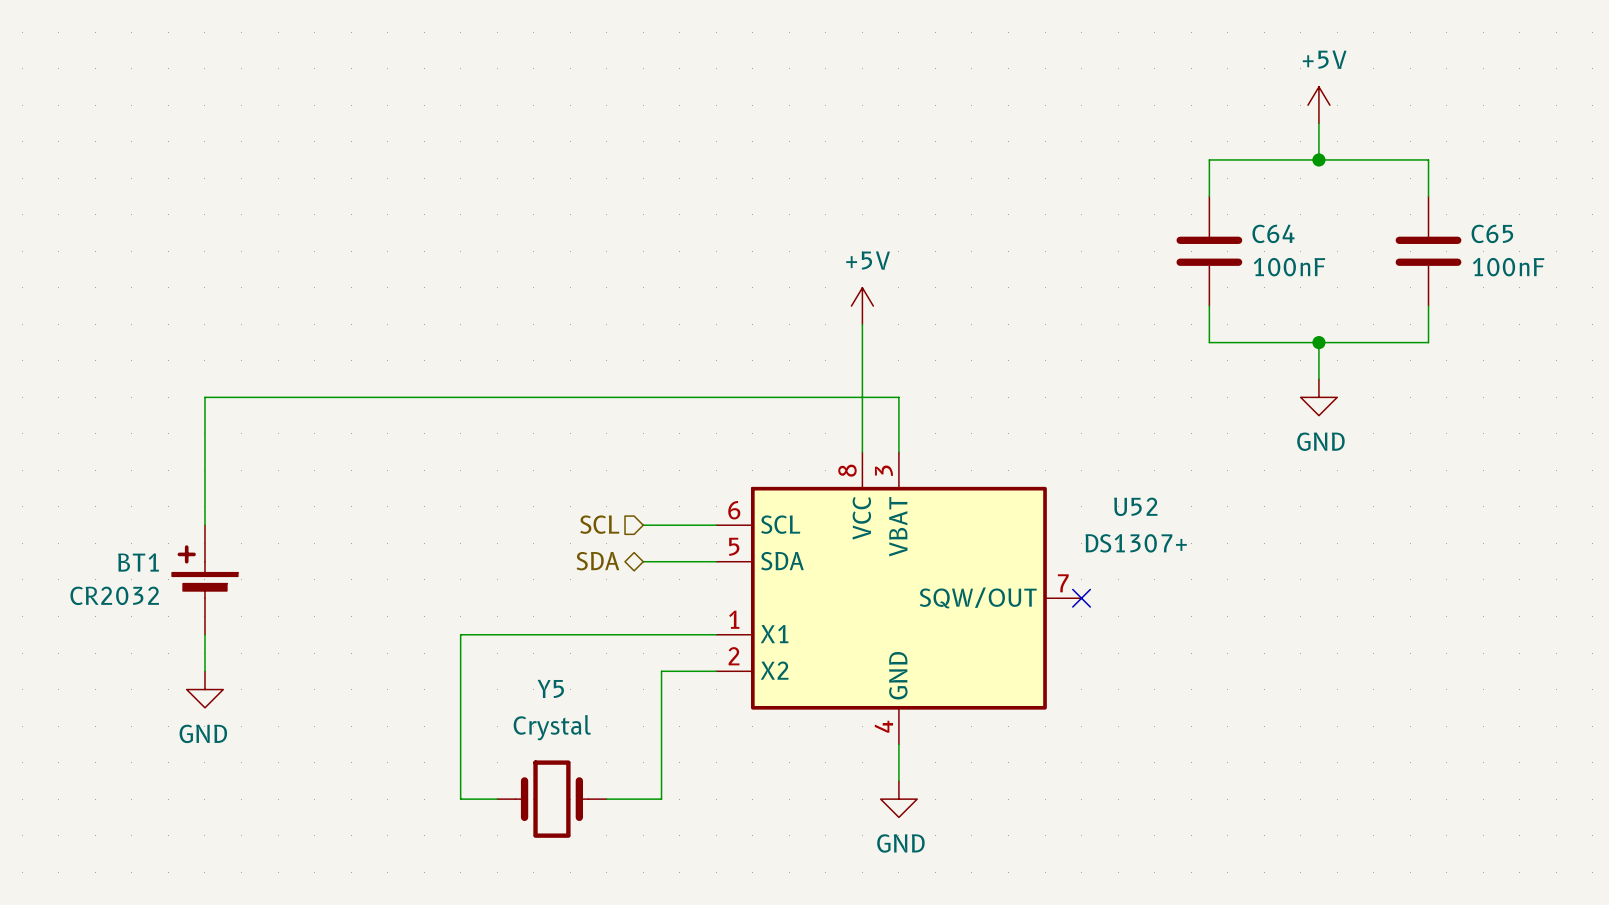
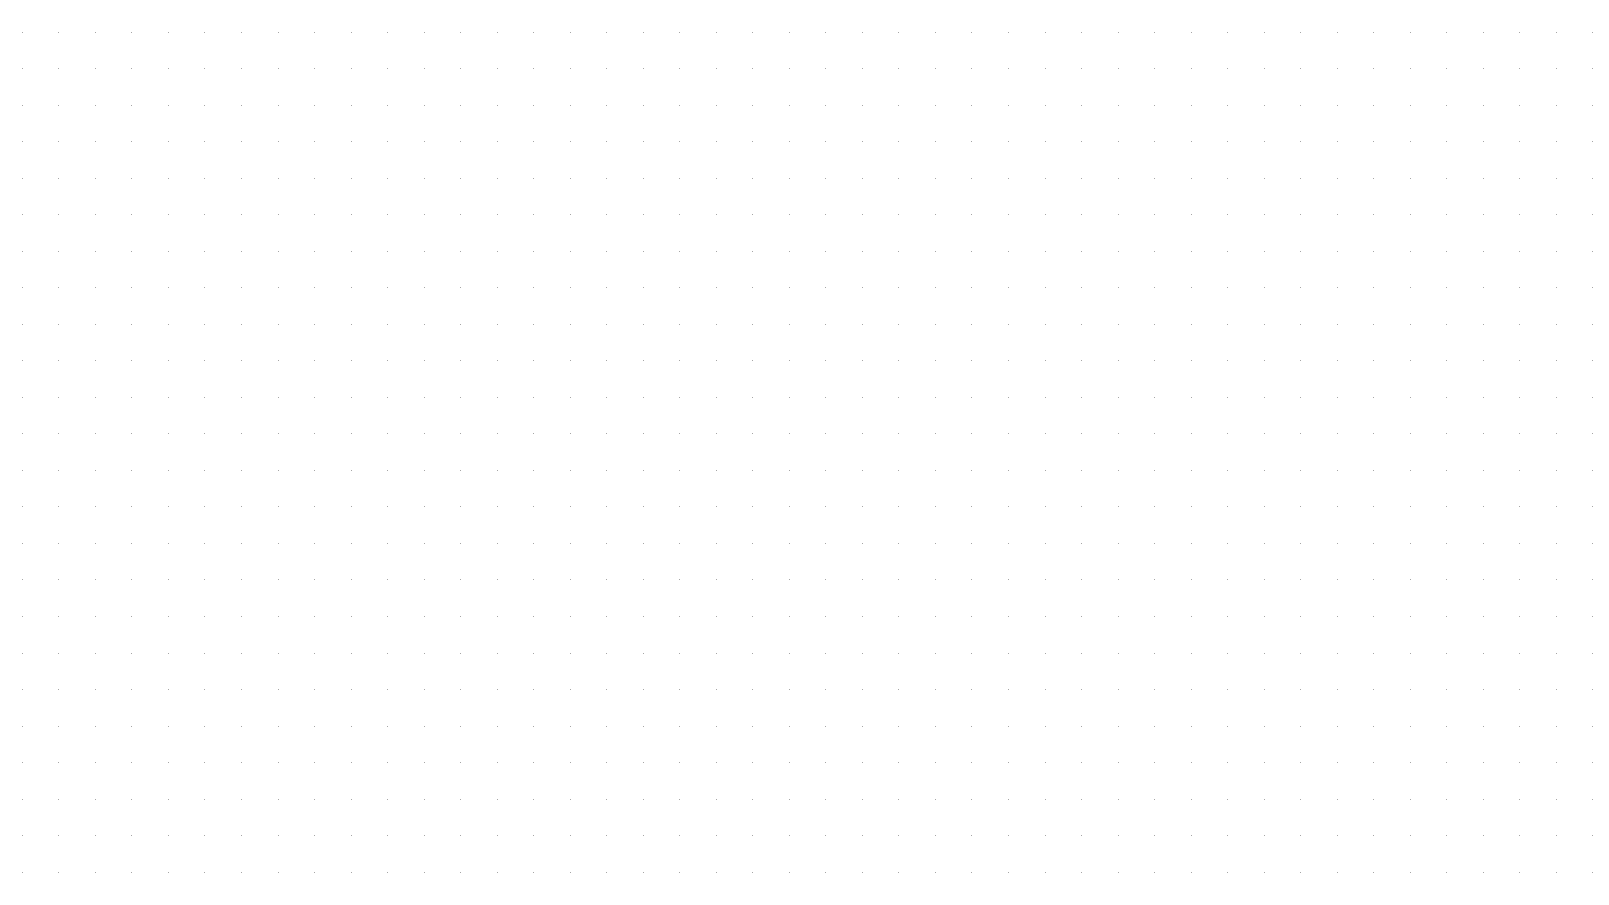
power symbol: +5V (1318, 105) -> none
wire: (1318, 123) (1318, 159) -> none
junction: (1318, 159) -> none
wire: (1209, 196) (1209, 159) (1428, 159) (1428, 196) -> none
C64: 100nF (1209, 251) -> none
C65: 100nF (1428, 251) -> none
power symbol: +5V (862, 306) -> none
wire: (1209, 306) (1209, 342) (1428, 342) (1428, 306) -> none
wire: (862, 324) (862, 452) -> none
wire: (1318, 342) (1318, 379) -> none
junction: (1318, 342) -> none
power symbol: GND (1318, 397) -> none
wire: (898, 452) (898, 397) (204, 397) (204, 525) -> none
hierarchical label: SCL (599, 524) -> none
wire: (643, 525) (716, 525) -> none
hierarchical label: SDA (597, 561) -> none
wire: (643, 561) (716, 561) -> none
BT1: CR2032 (204, 579) -> none
U52: DS1307+ (898, 598) -> none
no-connect mark: (1081, 598) -> none
wire: (204, 634) (204, 671) -> none
wire: (716, 634) (460, 634) (460, 799) (497, 799) -> none
wire: (716, 671) (661, 671) (661, 799) (606, 799) -> none
power symbol: GND (204, 689) -> none
wire: (898, 744) (898, 780) -> none
Y5: Crystal (551, 799) -> none
power symbol: GND (898, 799) -> none

